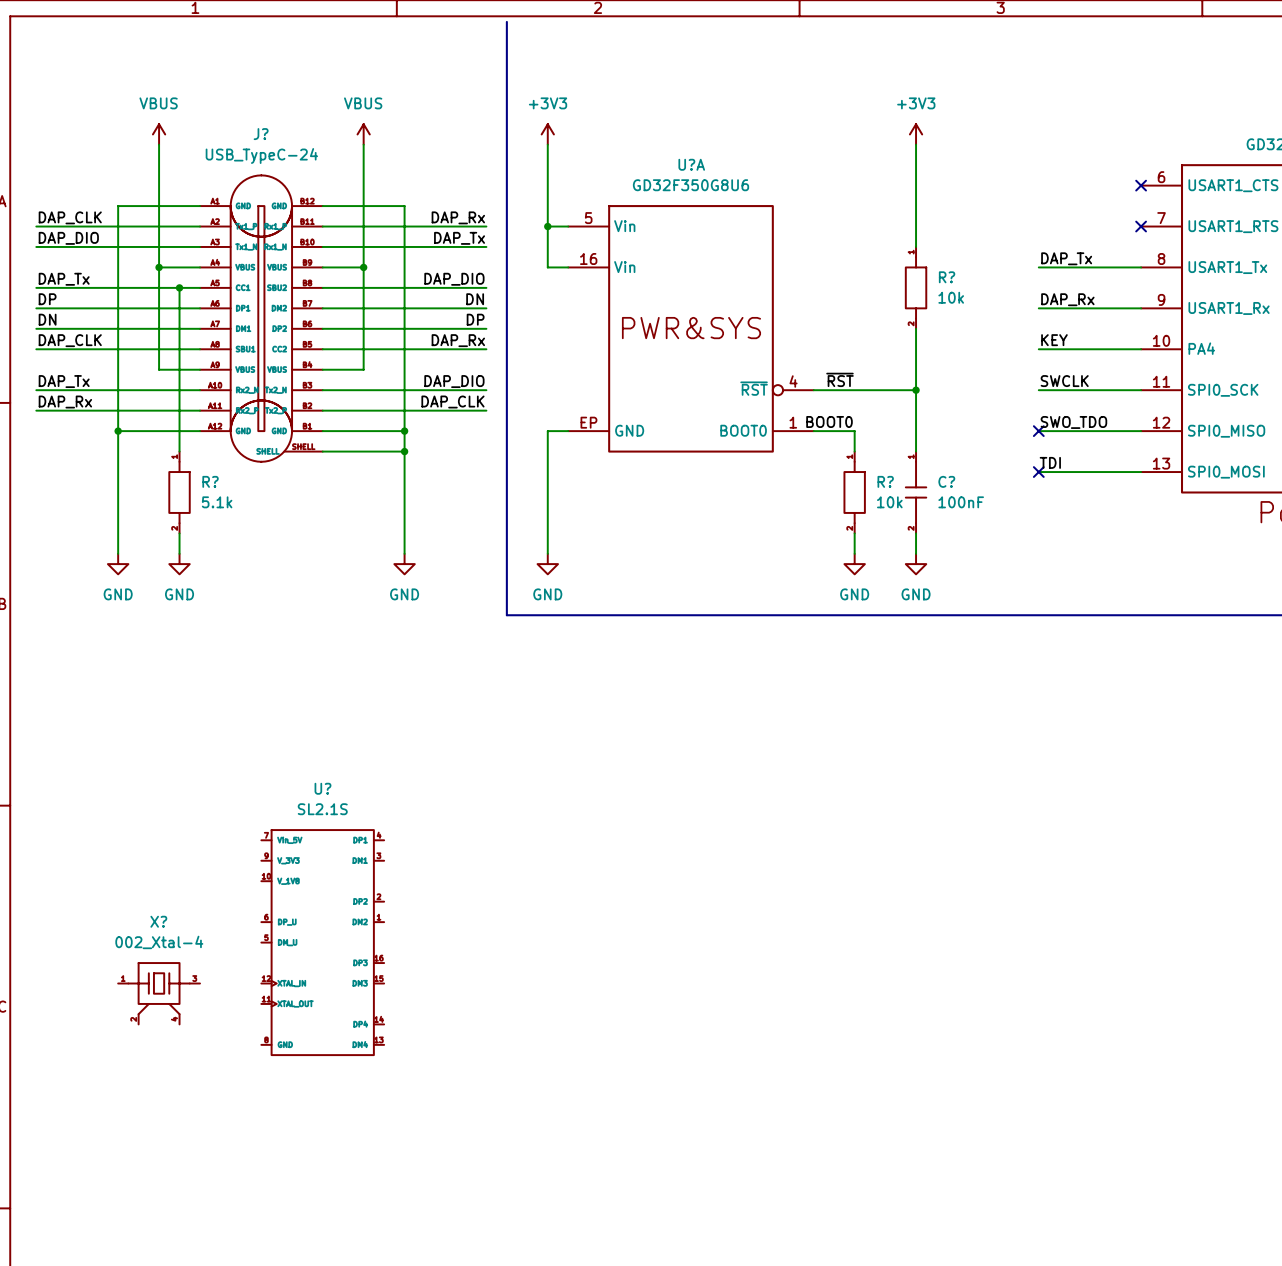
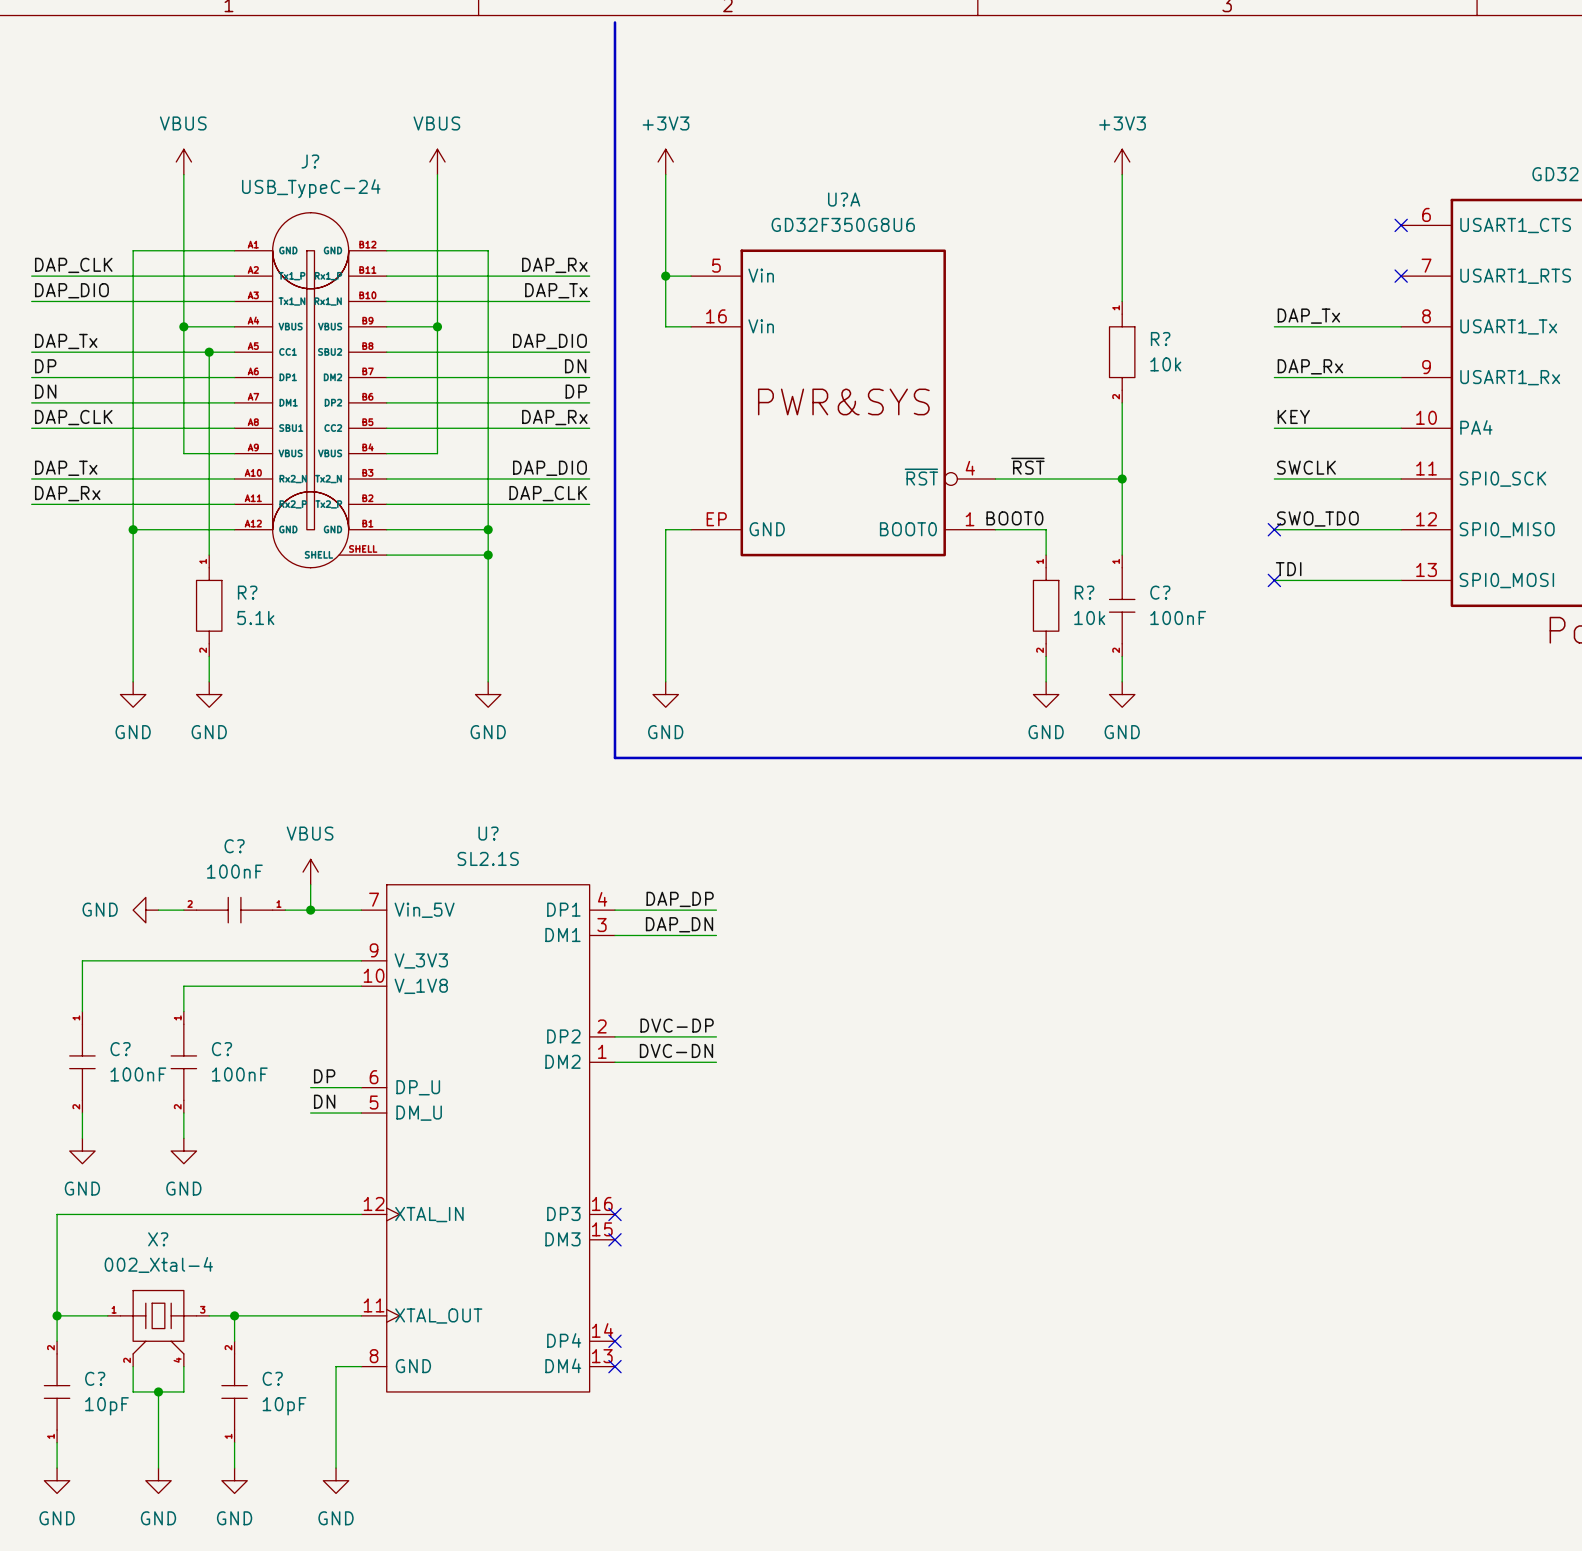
power symbol: none -> VBUS (310, 872)
wire: none -> (310, 884) (310, 910)
label: none -> DAP_DP (680, 899)
power symbol: none -> GND (145, 910)
wire: none -> (158, 910) (183, 910)
C?: none -> 100nF (234, 910)
wire: none -> (285, 910) (361, 910)
junction: none -> (310, 910)
wire: none -> (614, 910) (716, 910)
label: none -> DAP_DN (679, 924)
wire: none -> (614, 935) (716, 935)
wire: none -> (361, 960) (82, 960) (82, 1011)
wire: none -> (361, 986) (183, 986) (183, 1011)
label: none -> DVC-DP (677, 1025)
wire: none -> (614, 1036) (716, 1036)
label: none -> DVC-DN (676, 1050)
C?: none -> 100nF (82, 1062)
C?: none -> 100nF (183, 1062)
wire: none -> (614, 1062) (716, 1062)
label: none -> DP (324, 1076)
wire: none -> (310, 1087) (361, 1087)
label: none -> DN (324, 1101)
wire: none -> (82, 1113) (82, 1138)
wire: none -> (183, 1113) (183, 1138)
wire: none -> (310, 1113) (361, 1113)
U?: none -> SL2.1S (488, 1138)
power symbol: none -> GND (82, 1151)
power symbol: none -> GND (183, 1151)
U?: SL2.1S (322, 942) -> none
wire: none -> (361, 1214) (57, 1214) (57, 1341)
no-connect mark: none -> (614, 1214)
X? position: (159, 993) -> (158, 1328)
no-connect mark: none -> (614, 1239)
wire: none -> (57, 1315) (107, 1315)
junction: none -> (57, 1315)
wire: none -> (209, 1315) (361, 1315)
wire: none -> (234, 1315) (234, 1341)
junction: none -> (234, 1315)
no-connect mark: none -> (614, 1341)
wire: none -> (133, 1366) (133, 1391) (183, 1391) (183, 1366)
wire: none -> (361, 1366) (336, 1366) (336, 1468)
no-connect mark: none -> (614, 1366)
C?: none -> 10pF (57, 1391)
wire: none -> (158, 1391) (158, 1468)
junction: none -> (158, 1391)
C?: none -> 10pF (234, 1391)
wire: none -> (57, 1442) (57, 1468)
wire: none -> (234, 1442) (234, 1468)
power symbol: none -> GND (57, 1480)
power symbol: none -> GND (158, 1480)
power symbol: none -> GND (234, 1480)
power symbol: none -> GND (336, 1480)

